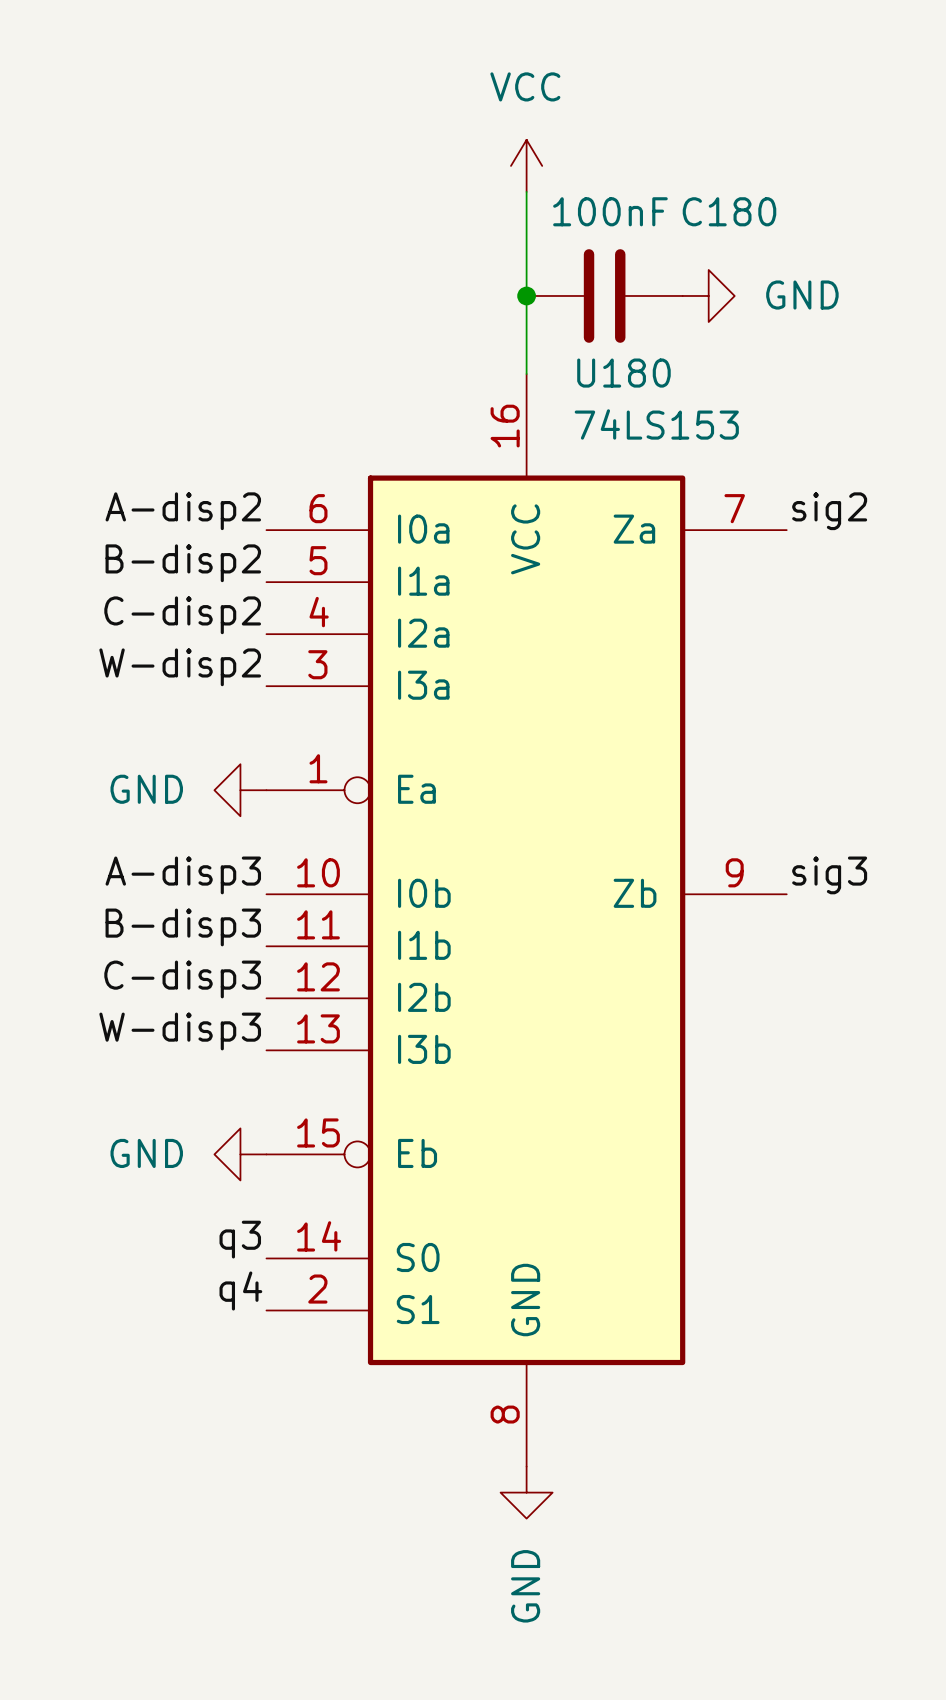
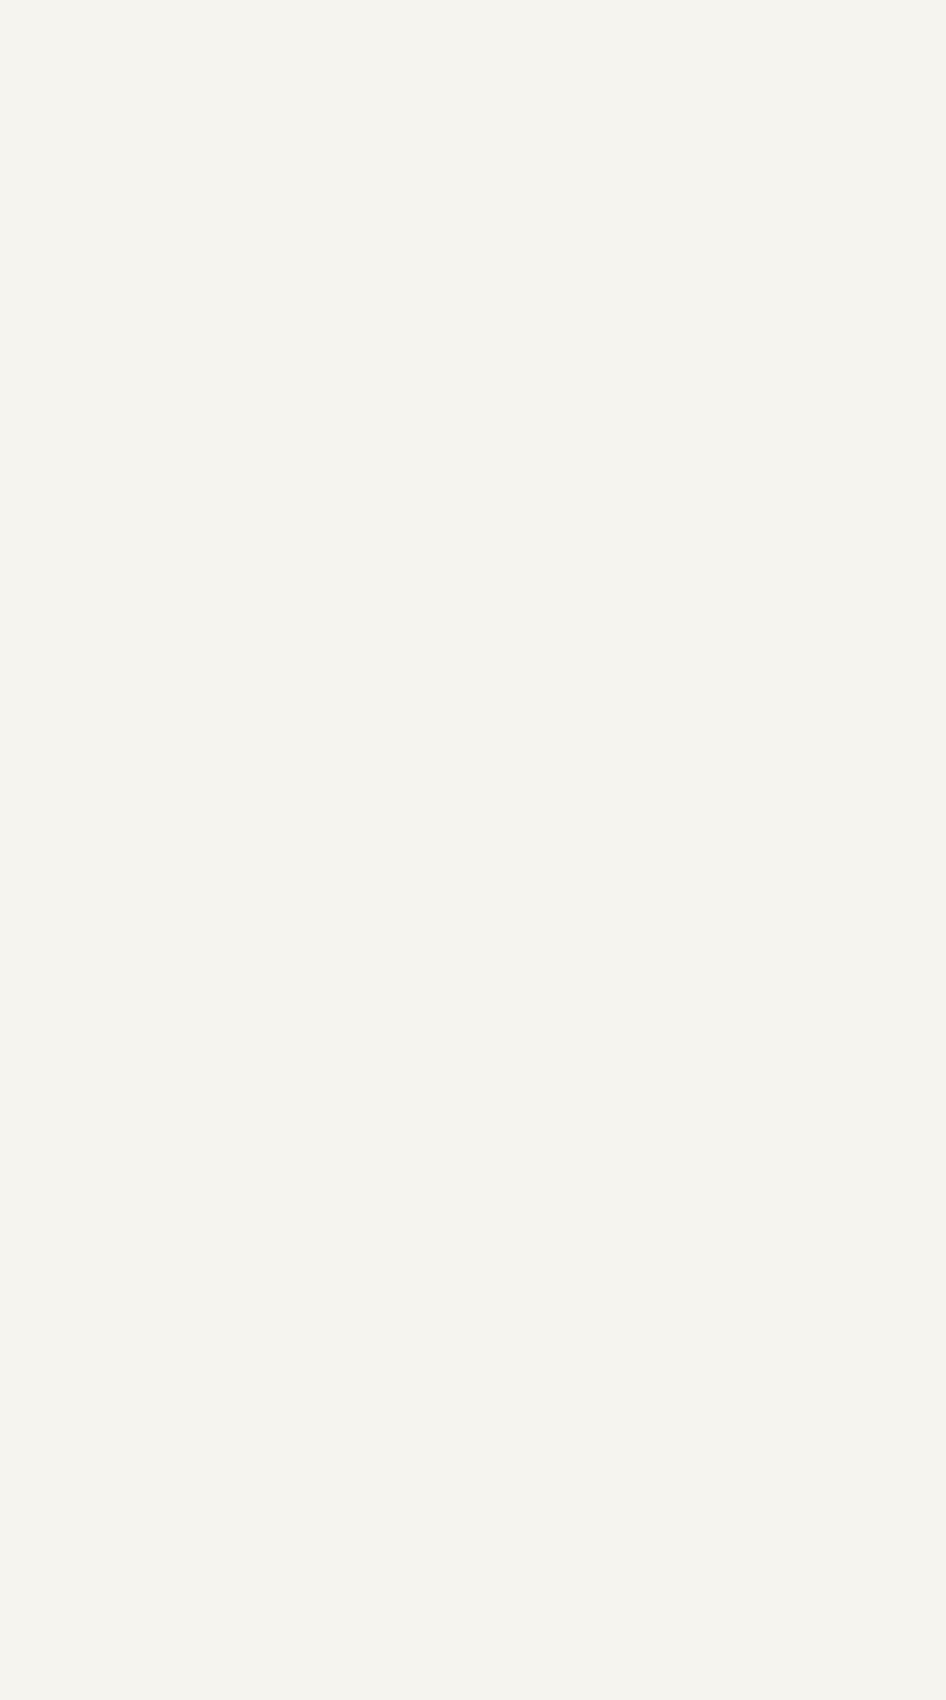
power symbol: VCC (526, 165) -> none
wire: (526, 191) (526, 374) -> none
junction: (526, 295) -> none
C180: 100nF (604, 295) -> none
power symbol: GND (708, 295) -> none
label: A-disp2 (183, 511) -> none
label: sig2 (829, 511) -> none
label: B-disp2 (183, 563) -> none
label: C-disp2 (182, 615) -> none
label: W-disp2 (180, 667) -> none
power symbol: GND (240, 790) -> none
label: A-disp3 (183, 875) -> none
label: sig3 (829, 875) -> none
U180: 74LS153 (526, 920) -> none
label: B-disp3 (183, 927) -> none
label: C-disp3 (182, 979) -> none
label: W-disp3 (180, 1031) -> none
power symbol: GND (240, 1154) -> none
label: q3 (240, 1239) -> none
label: q4 (240, 1291) -> none
power symbol: GND (526, 1492) -> none

